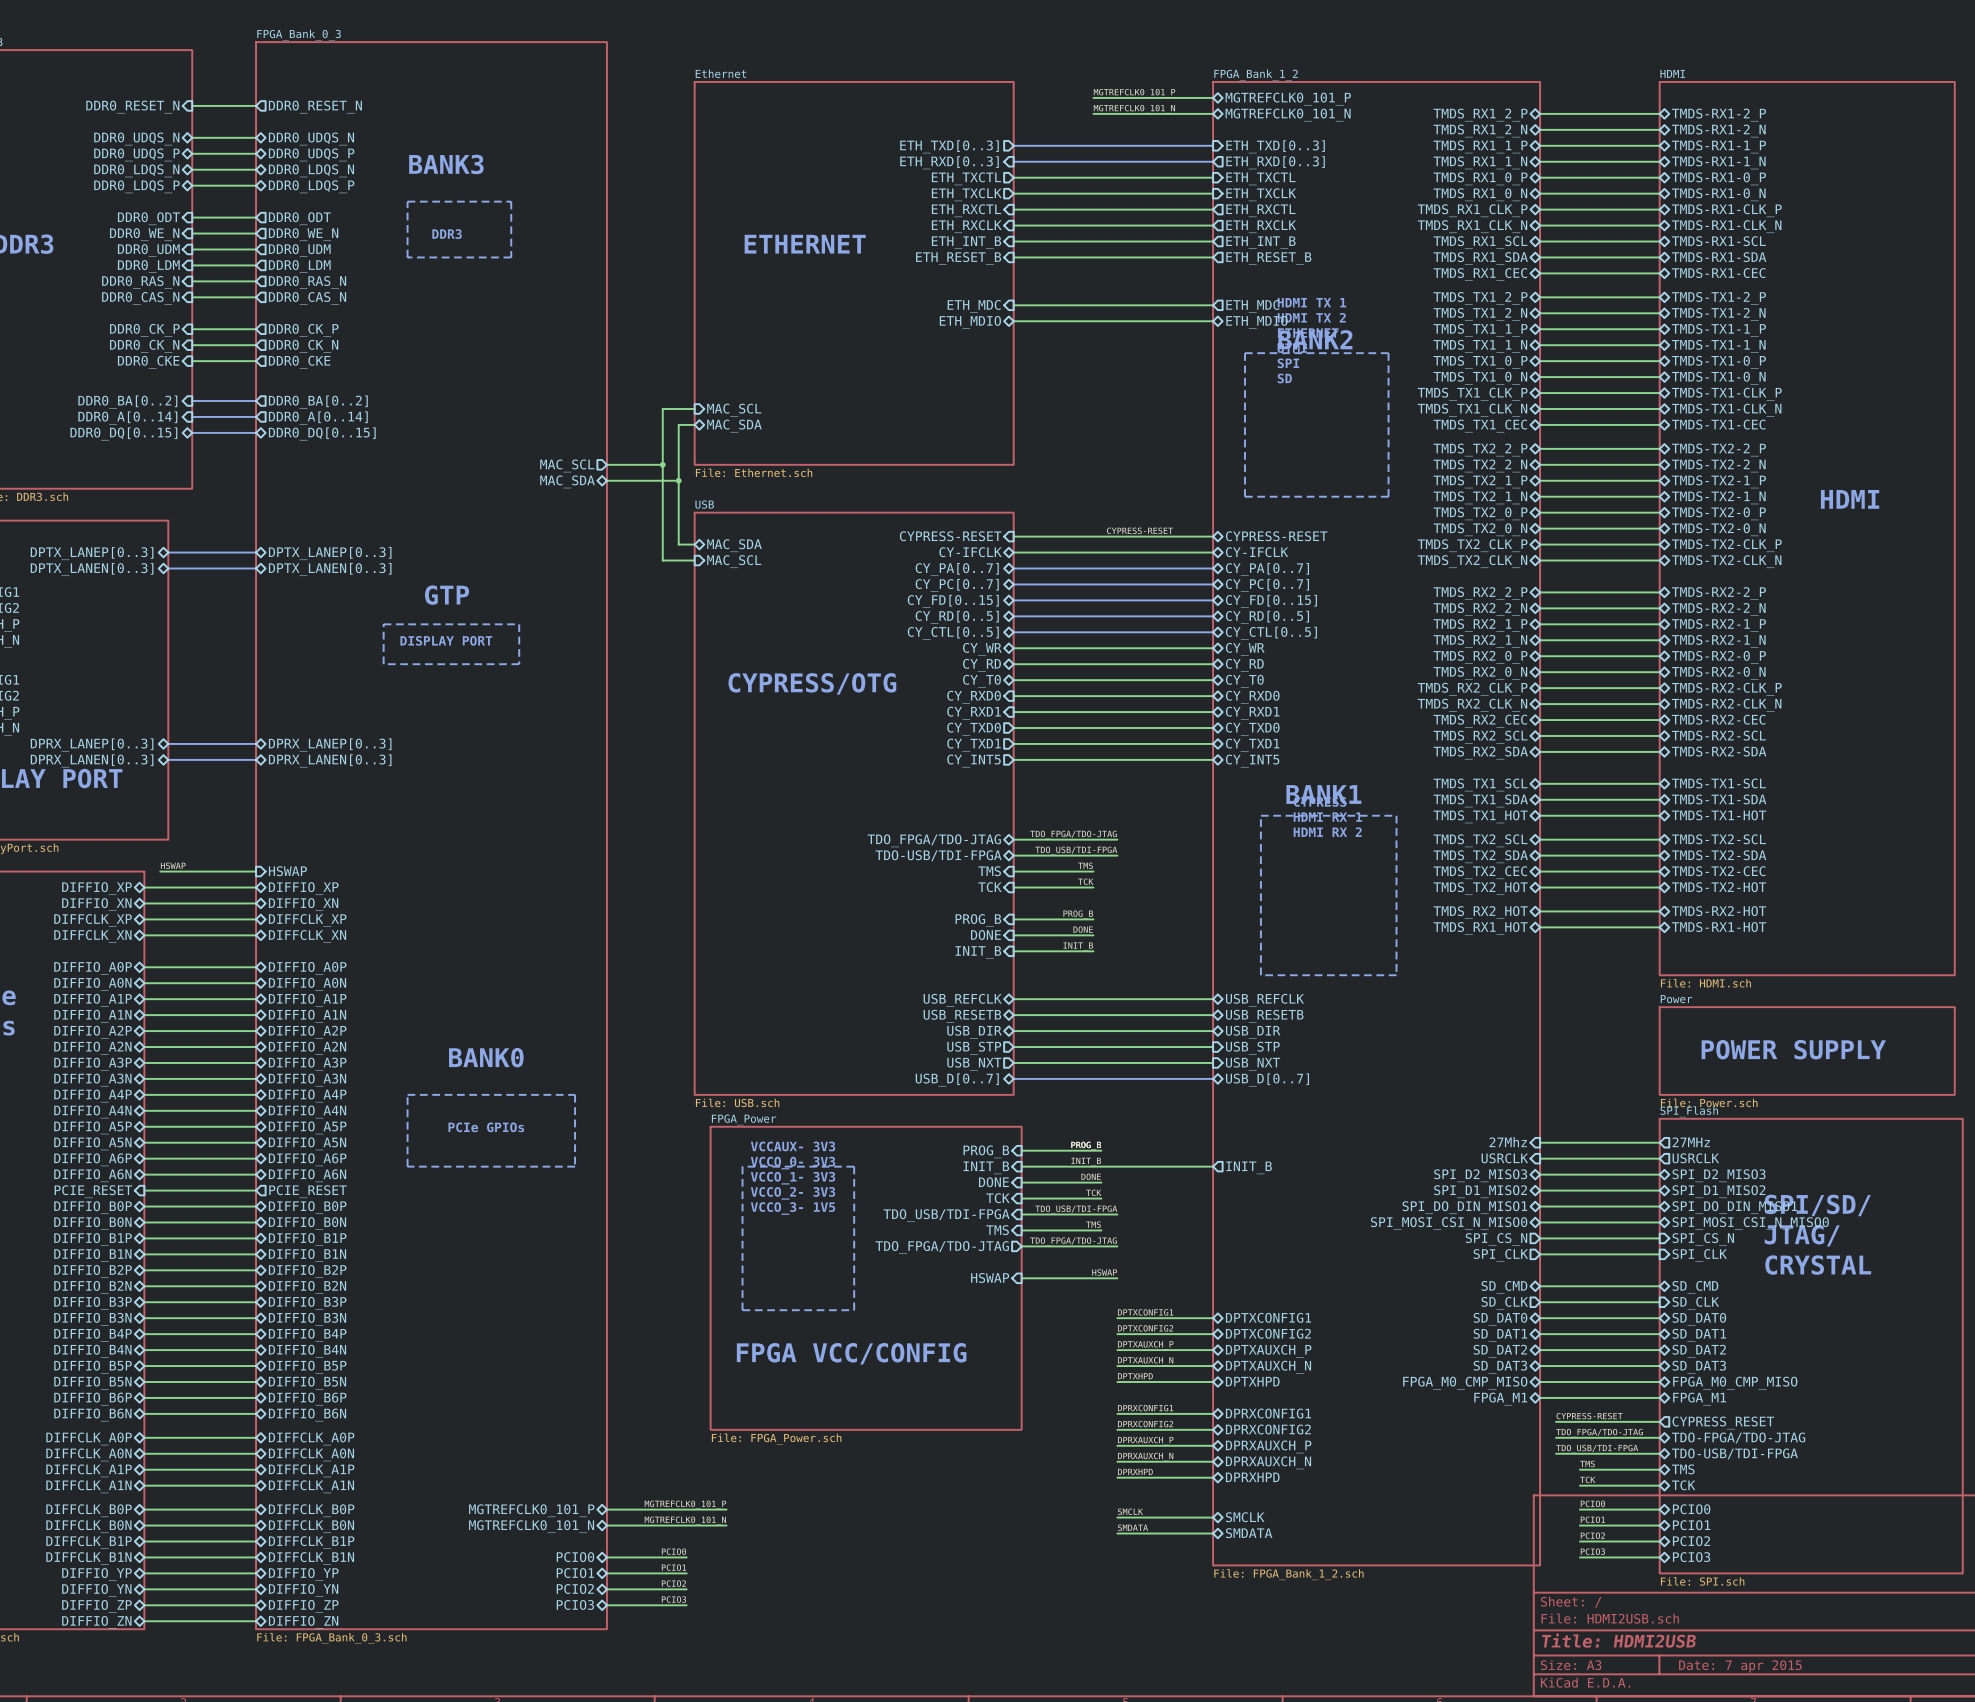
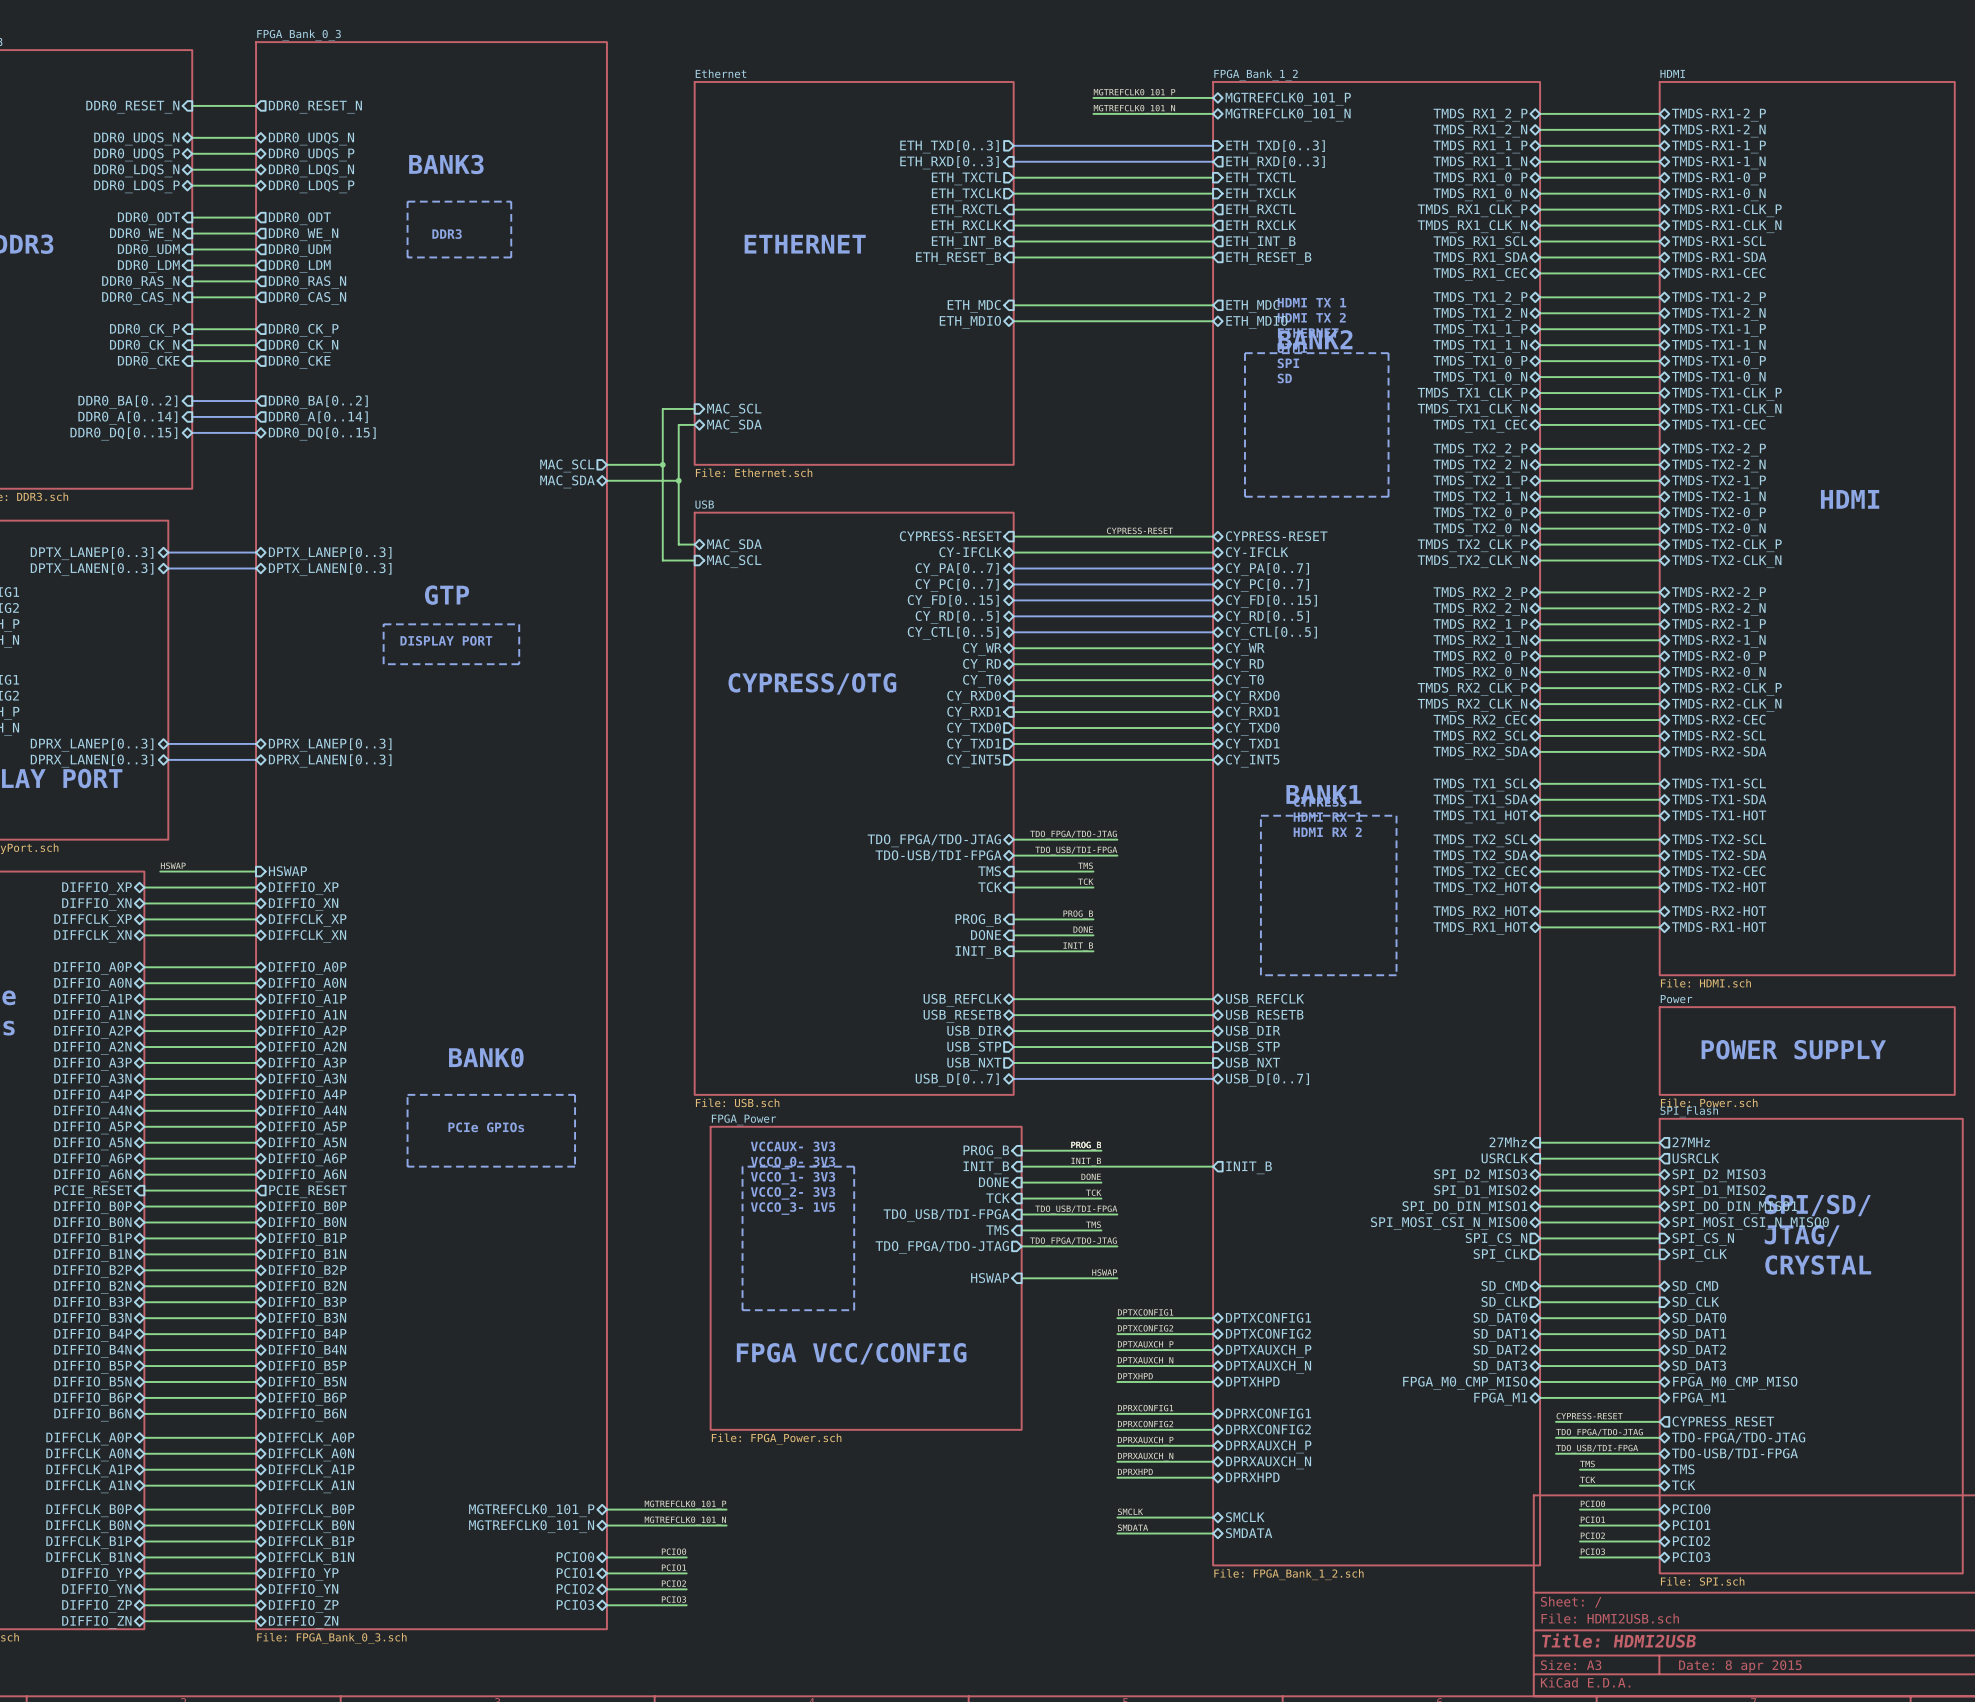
title block: Date: 7 apr 2015 (1740, 1666) -> Date: 8 apr 2015 (1740, 1666)

